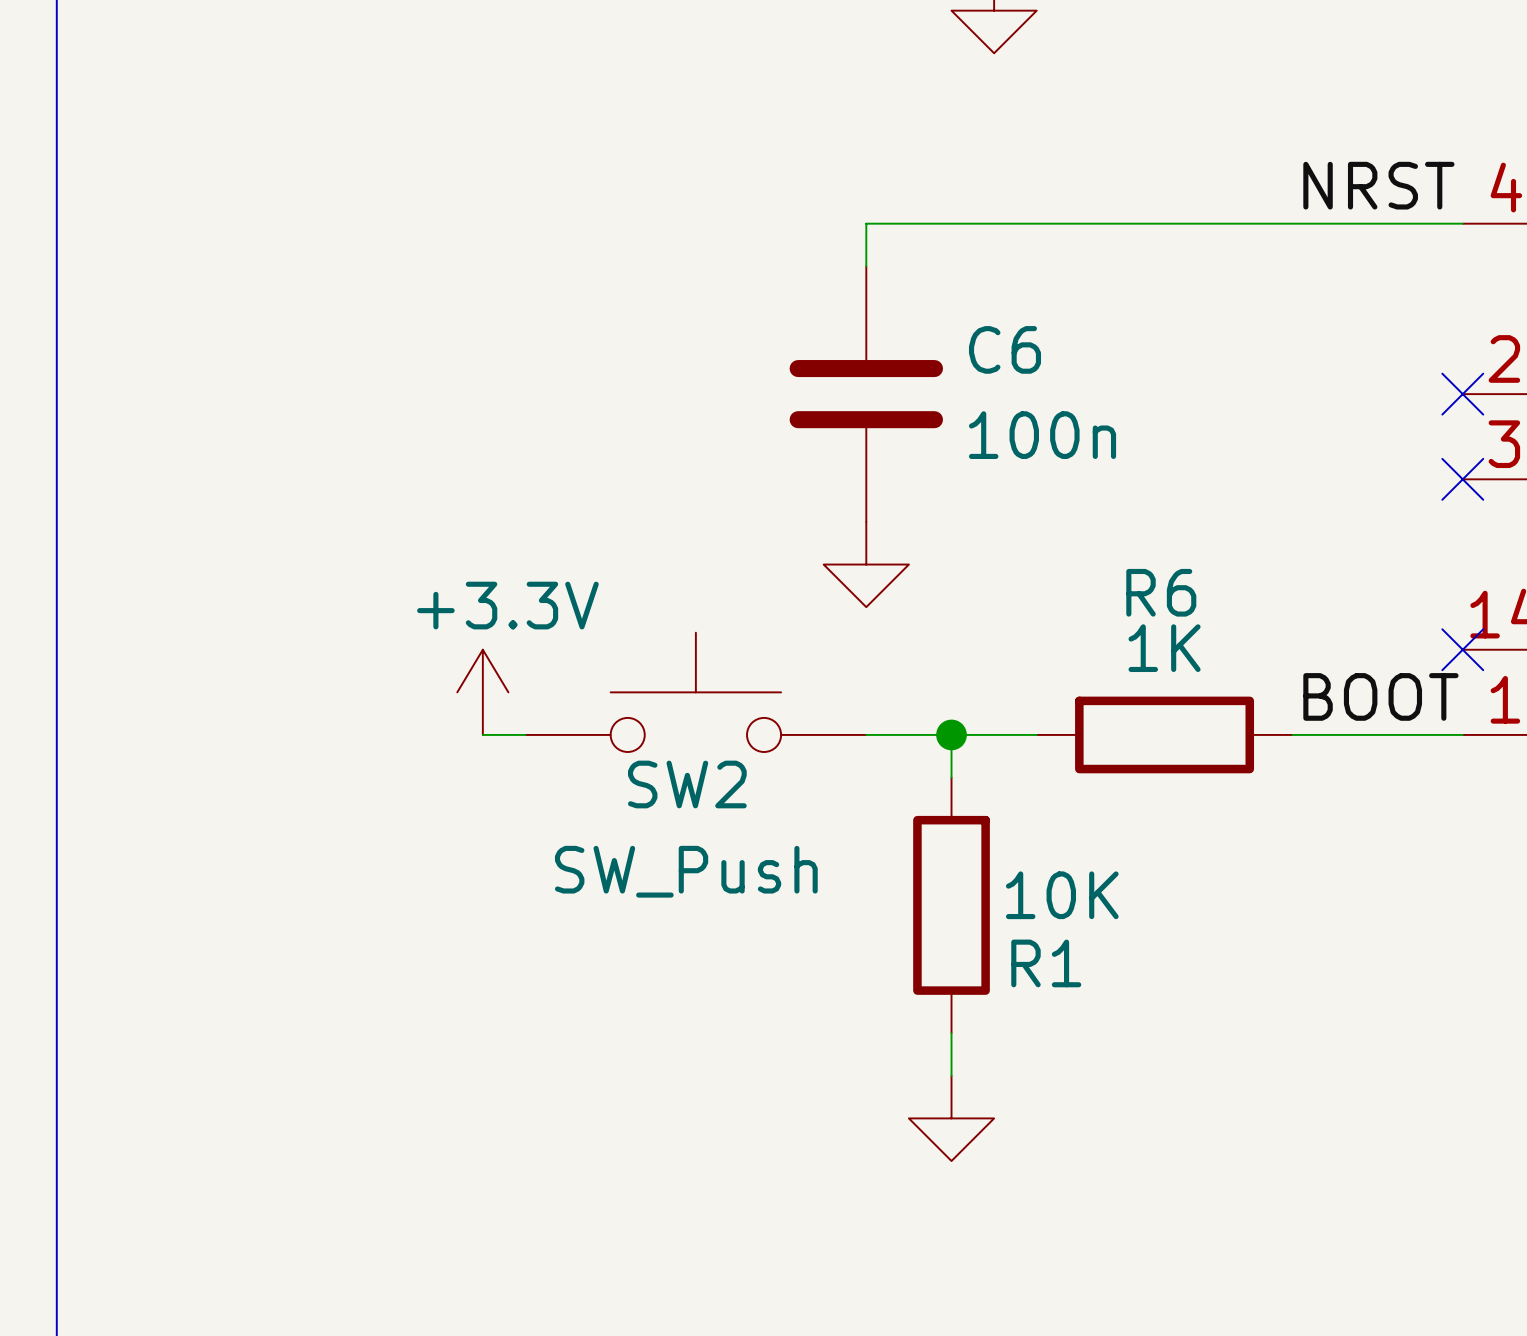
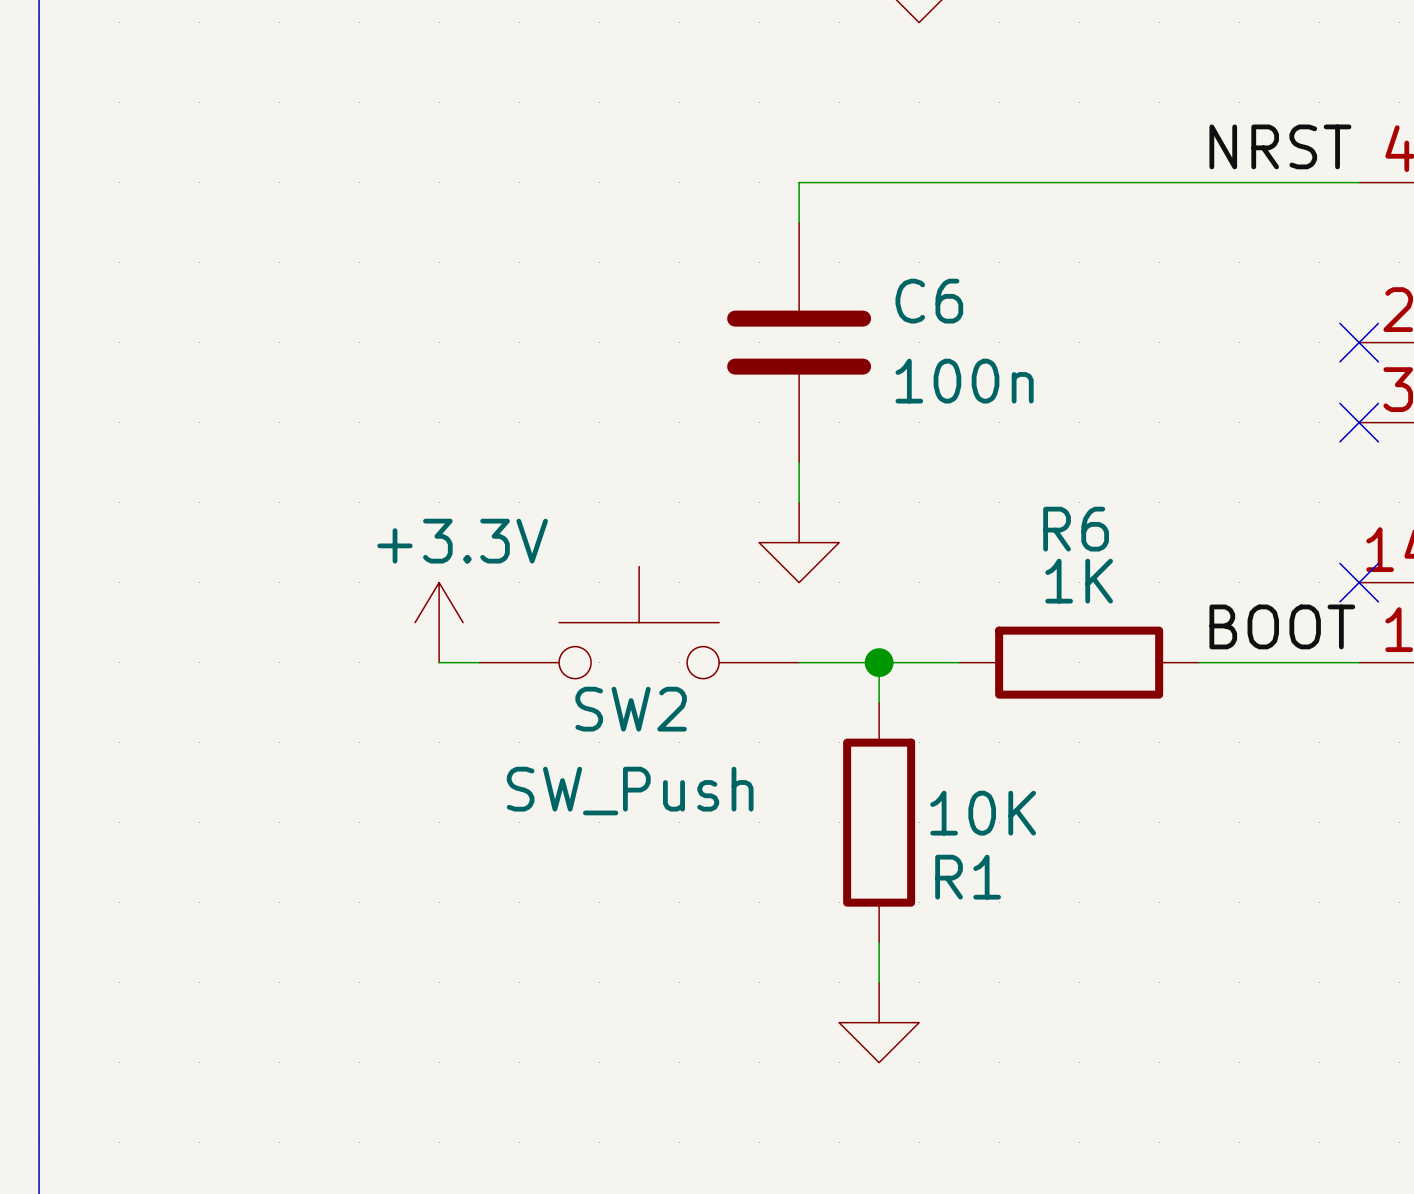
power symbol position: (866, 564) -> (799, 542)

